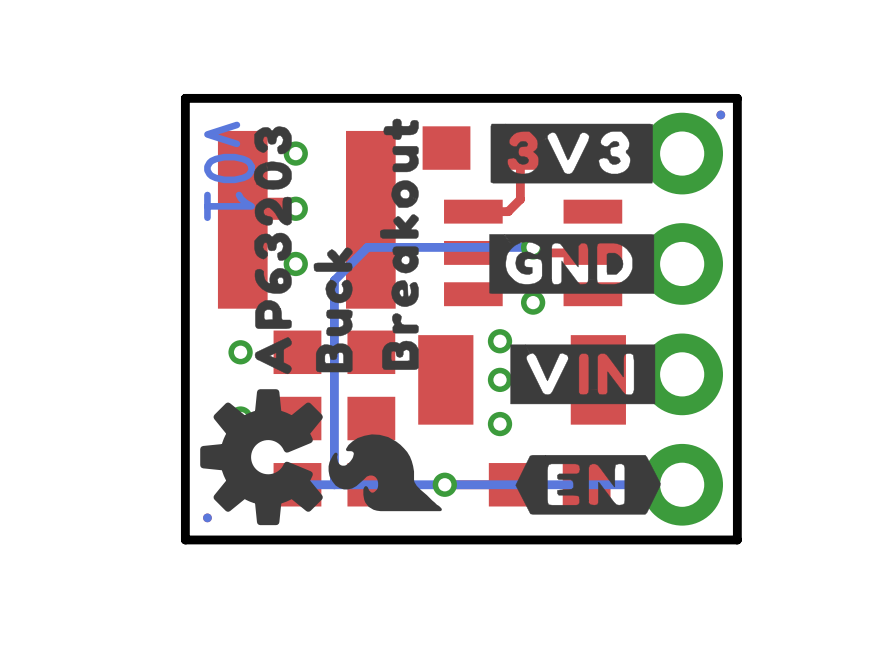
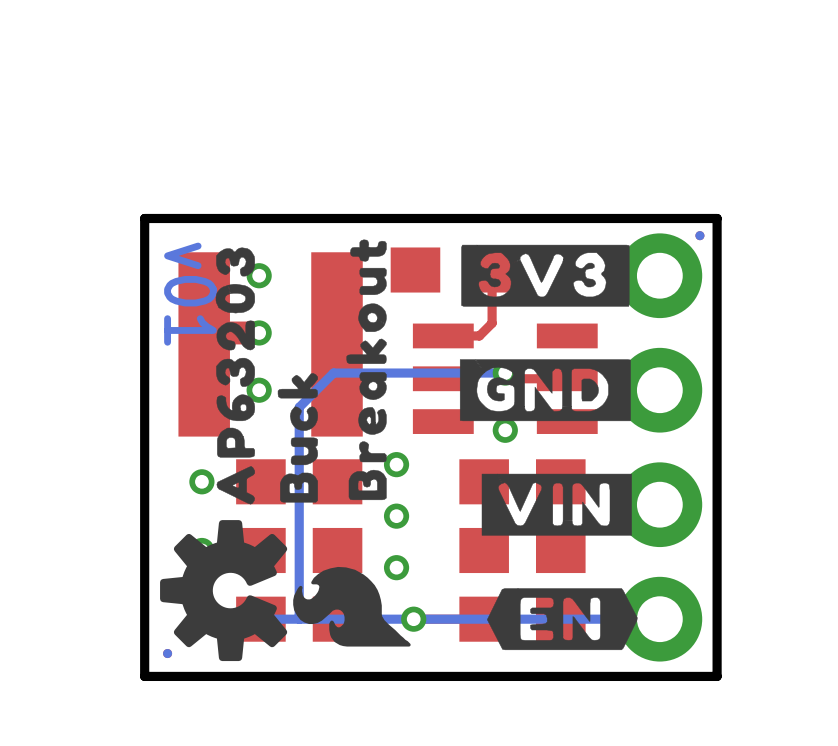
via: none -> (396, 464)
via: (500, 341) -> none
part: none -> (522, 481)
via: (500, 379) -> none
part: (522, 379) -> none
via: none -> (396, 516)
part: none -> (522, 550)
via: (500, 424) -> none
via: none -> (396, 567)

